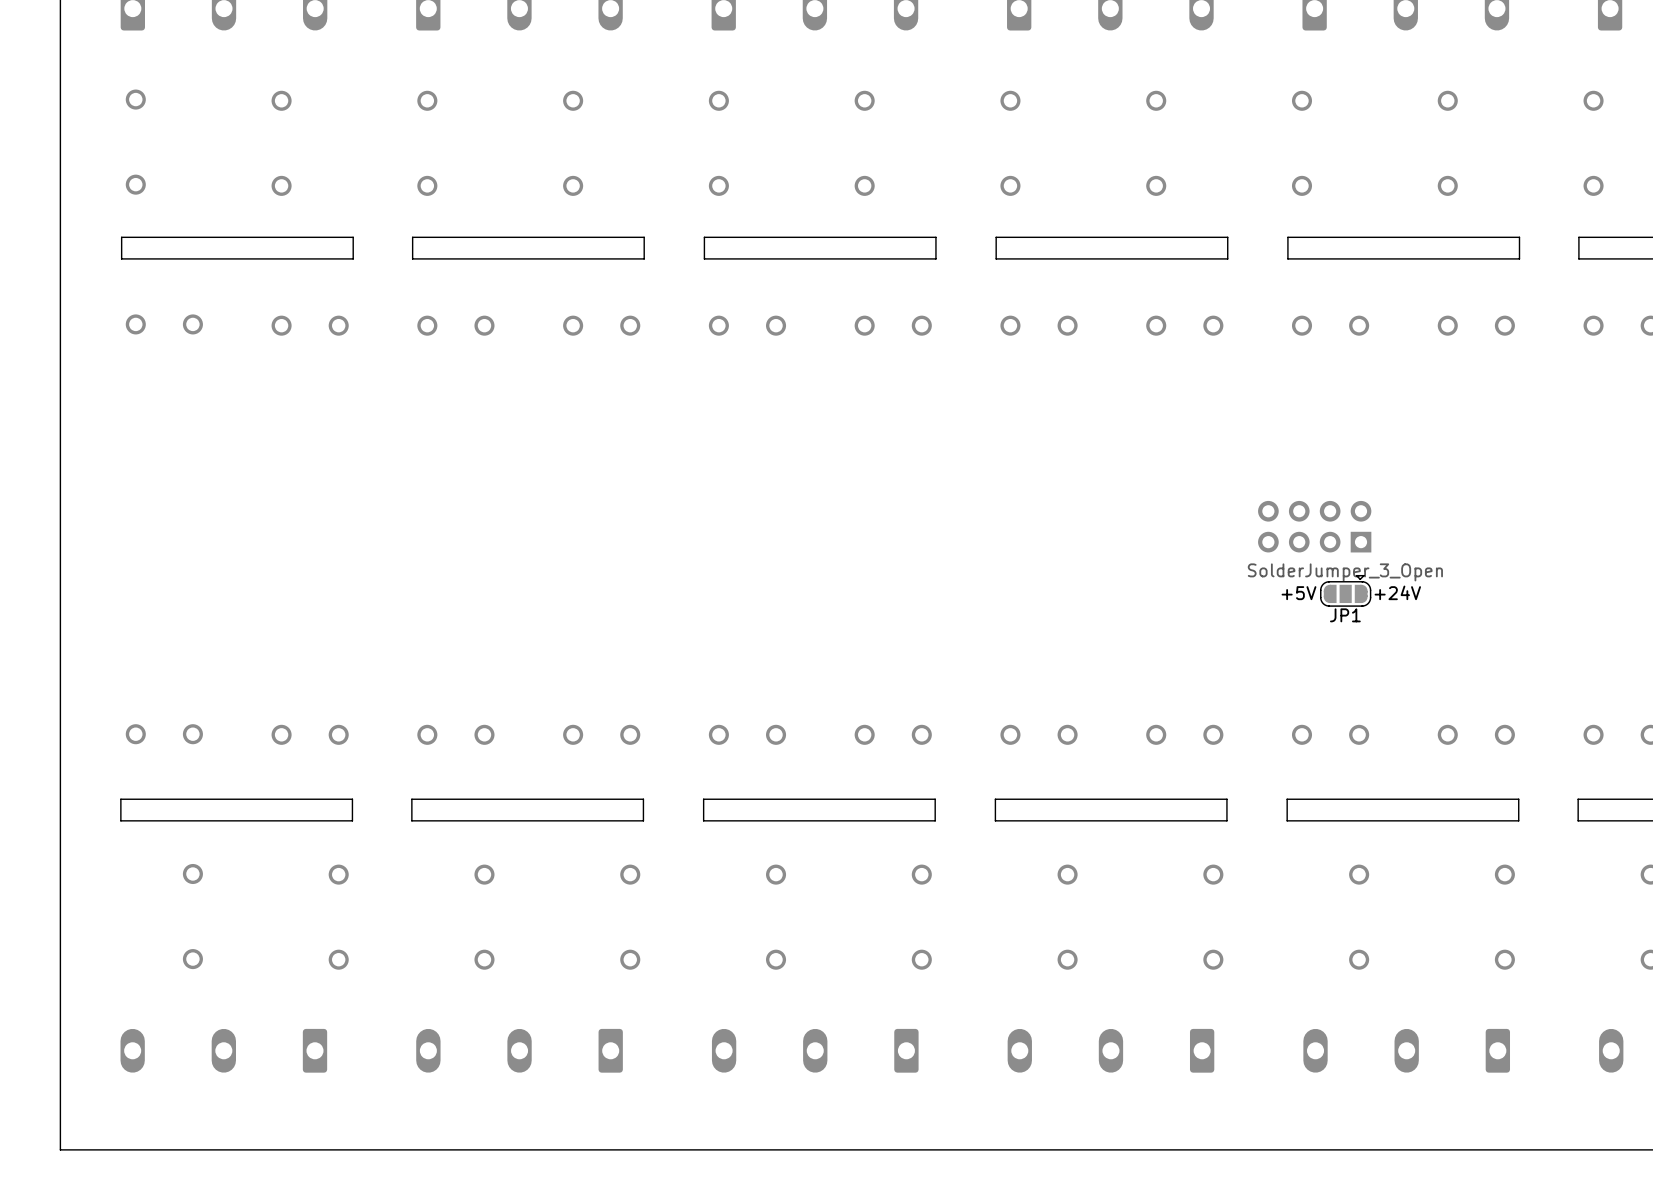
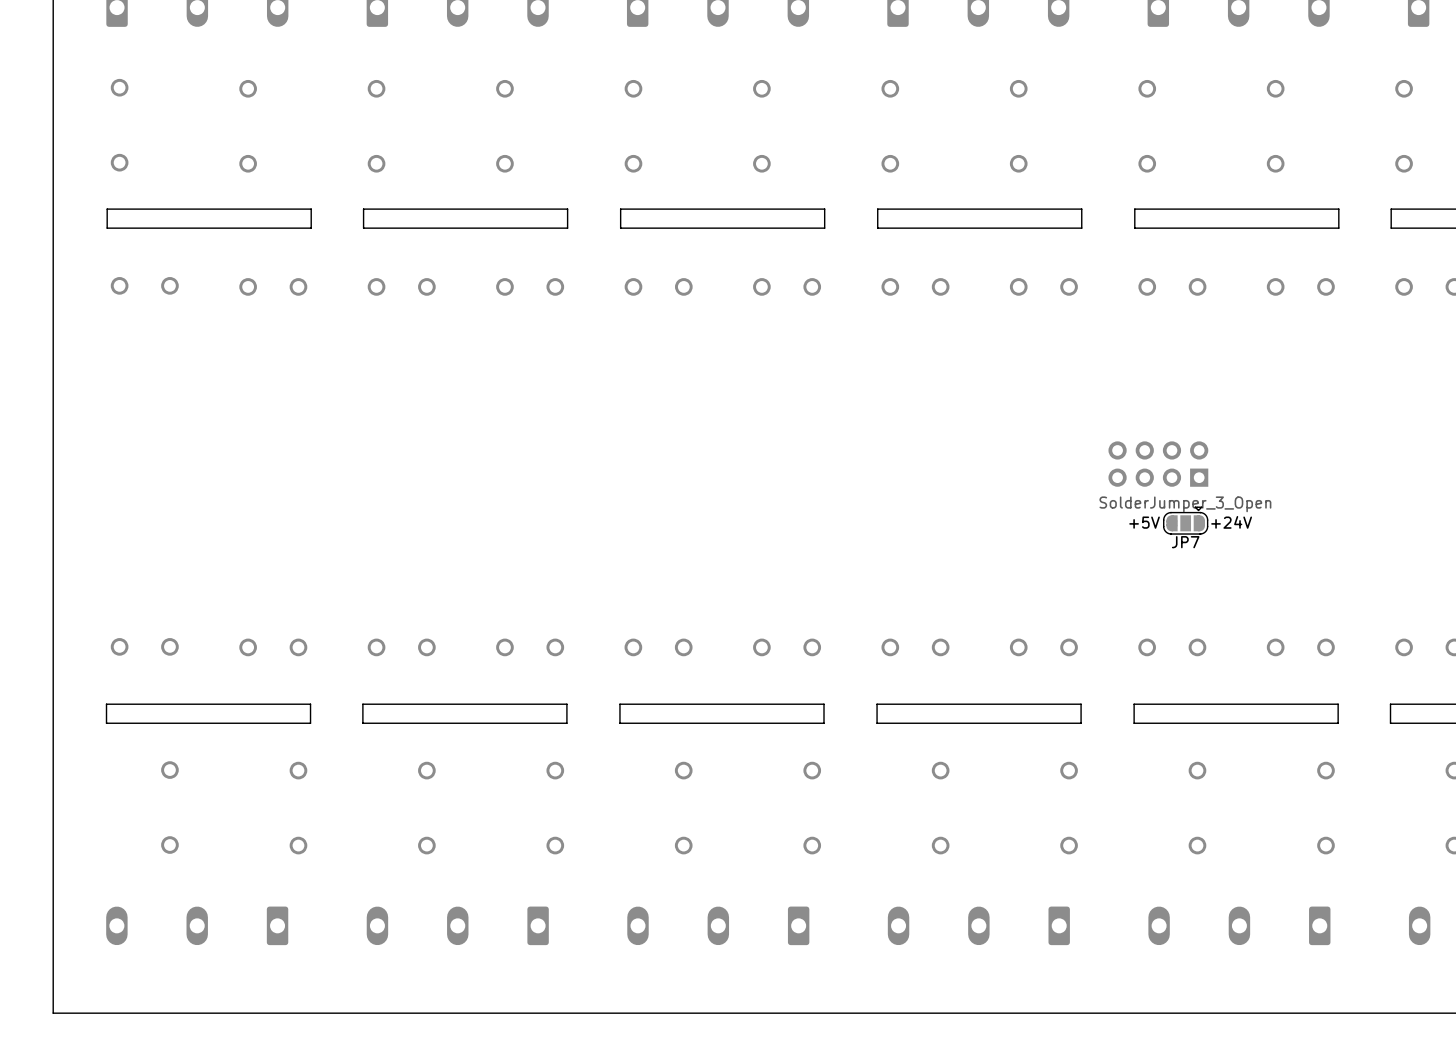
JP1 name: JP1 (1345, 615) -> JP7 (1185, 542)

